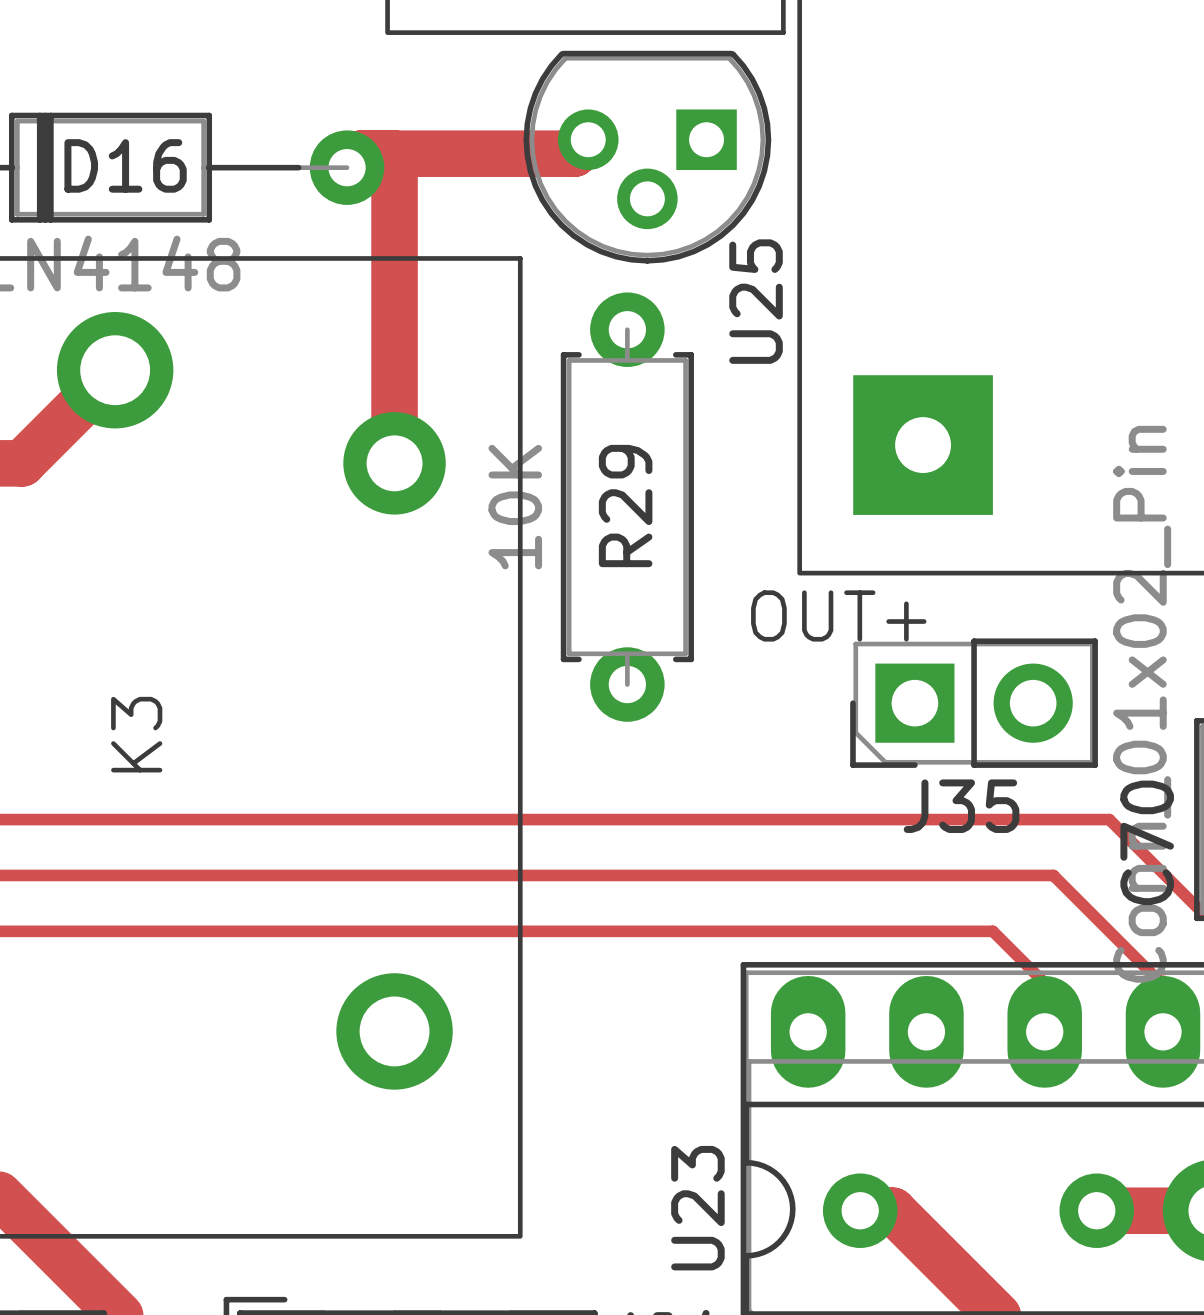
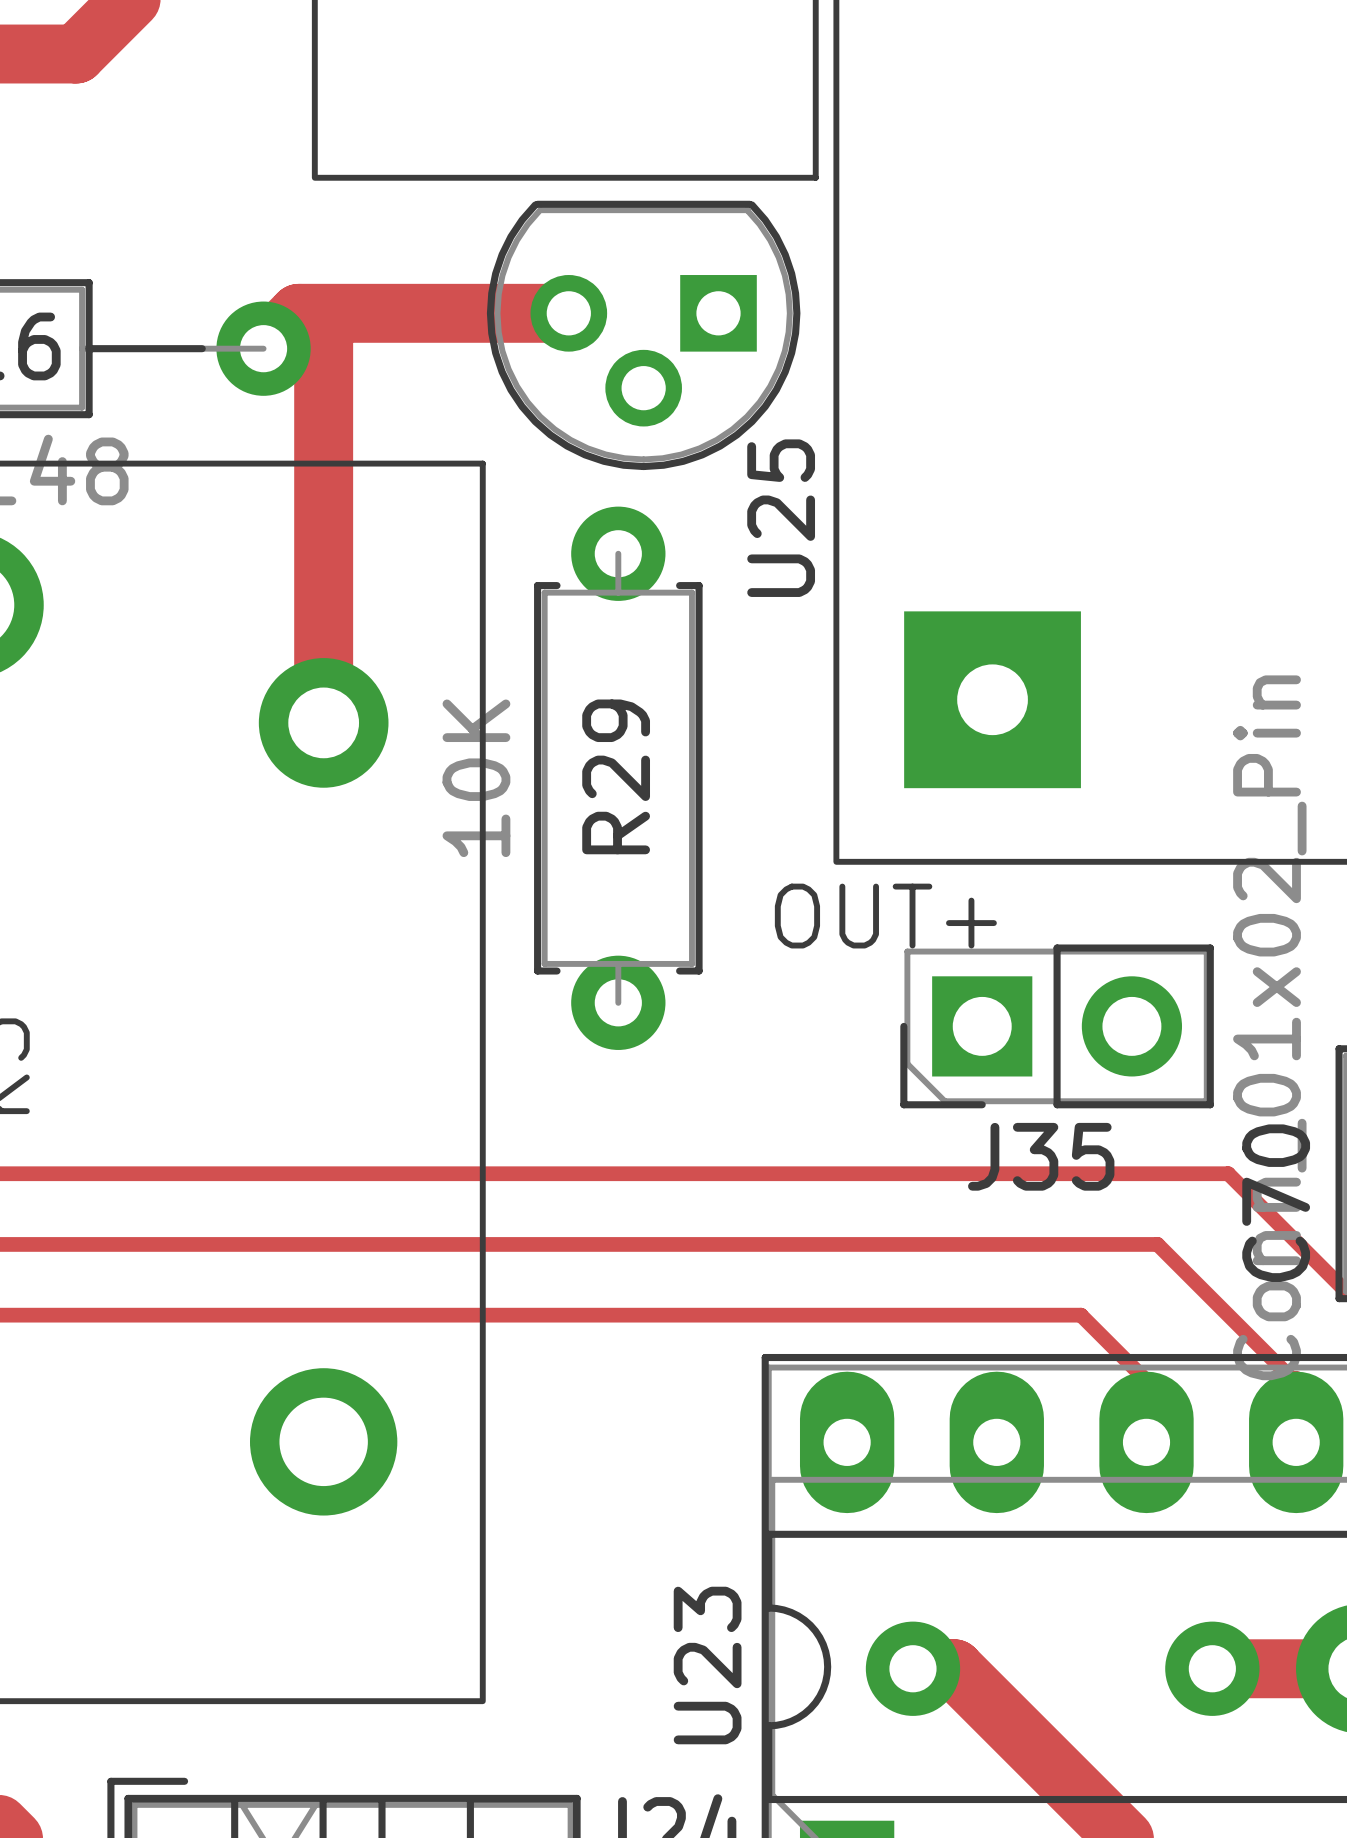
track: (588, 139) (574, 153) (361, 153) -> (568, 313) (298, 313) (281, 331)

